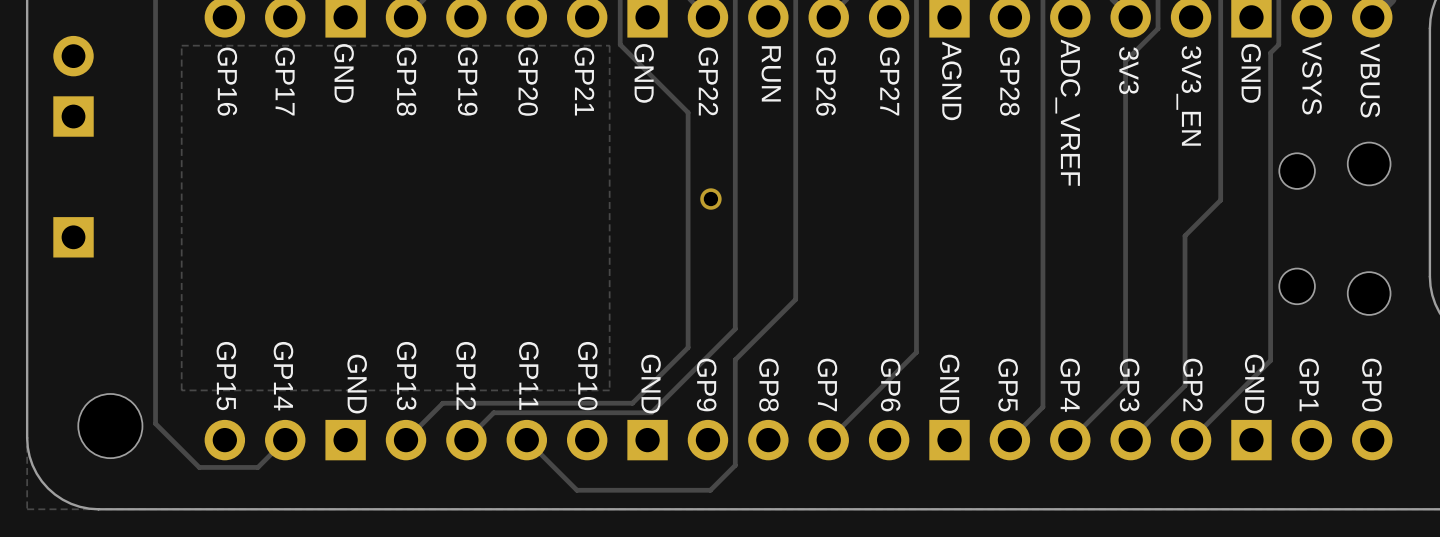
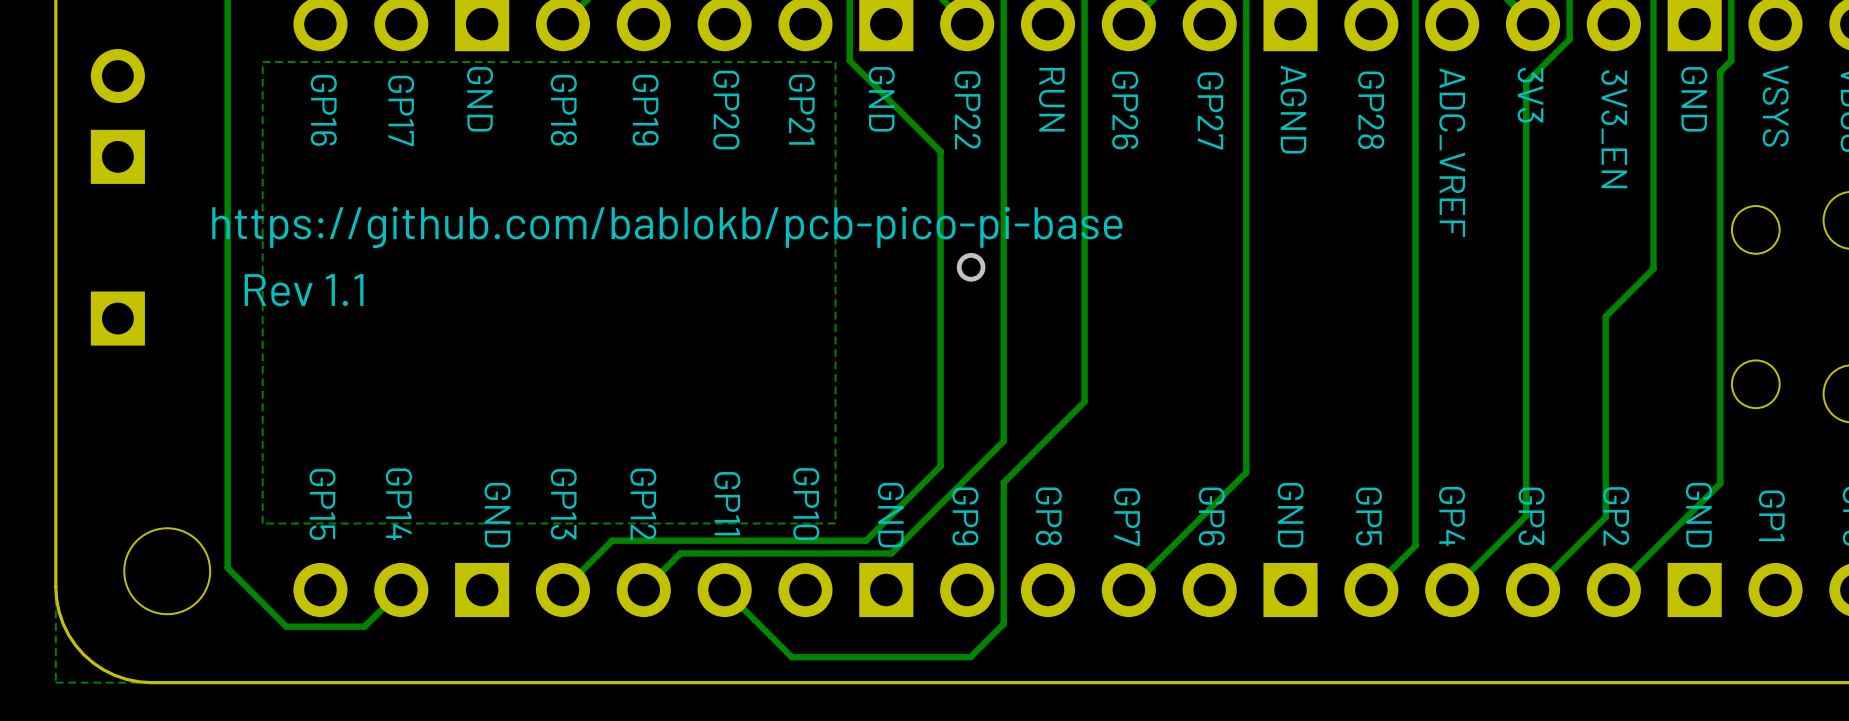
text: none -> https://github.com/bablokb/pcb-pico-pi-base (667, 227)
text: none -> Rev 1.1 (304, 290)

